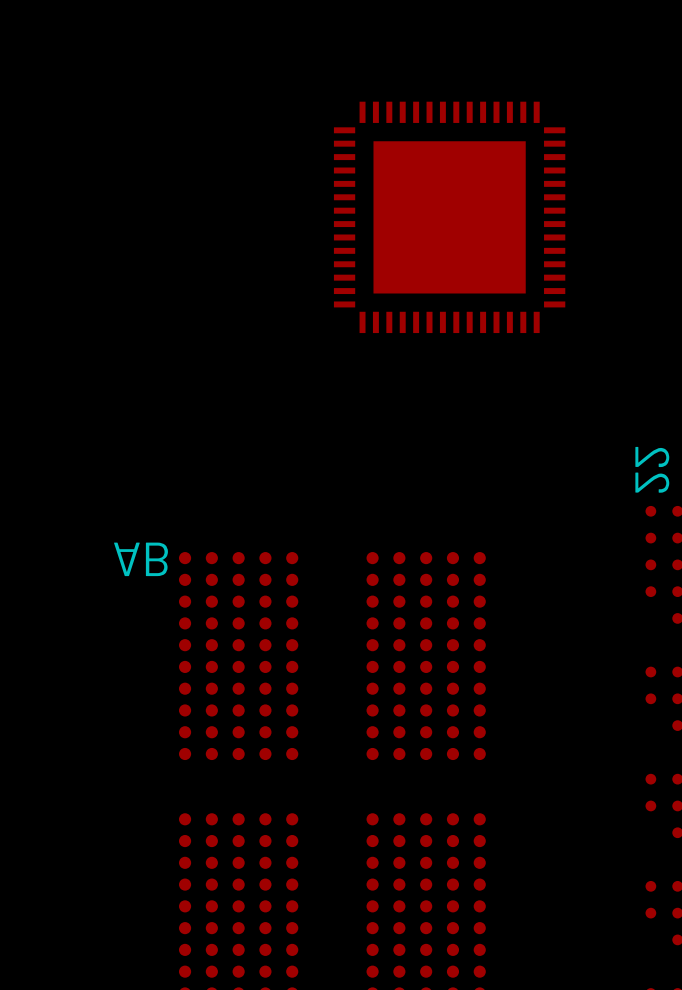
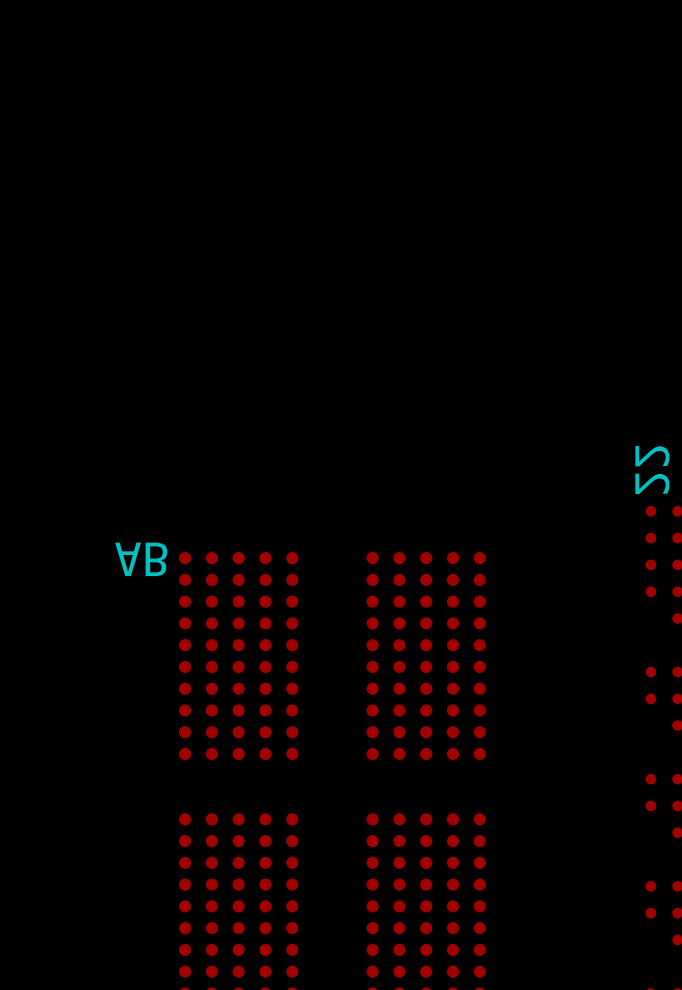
part: (449, 217) -> none

